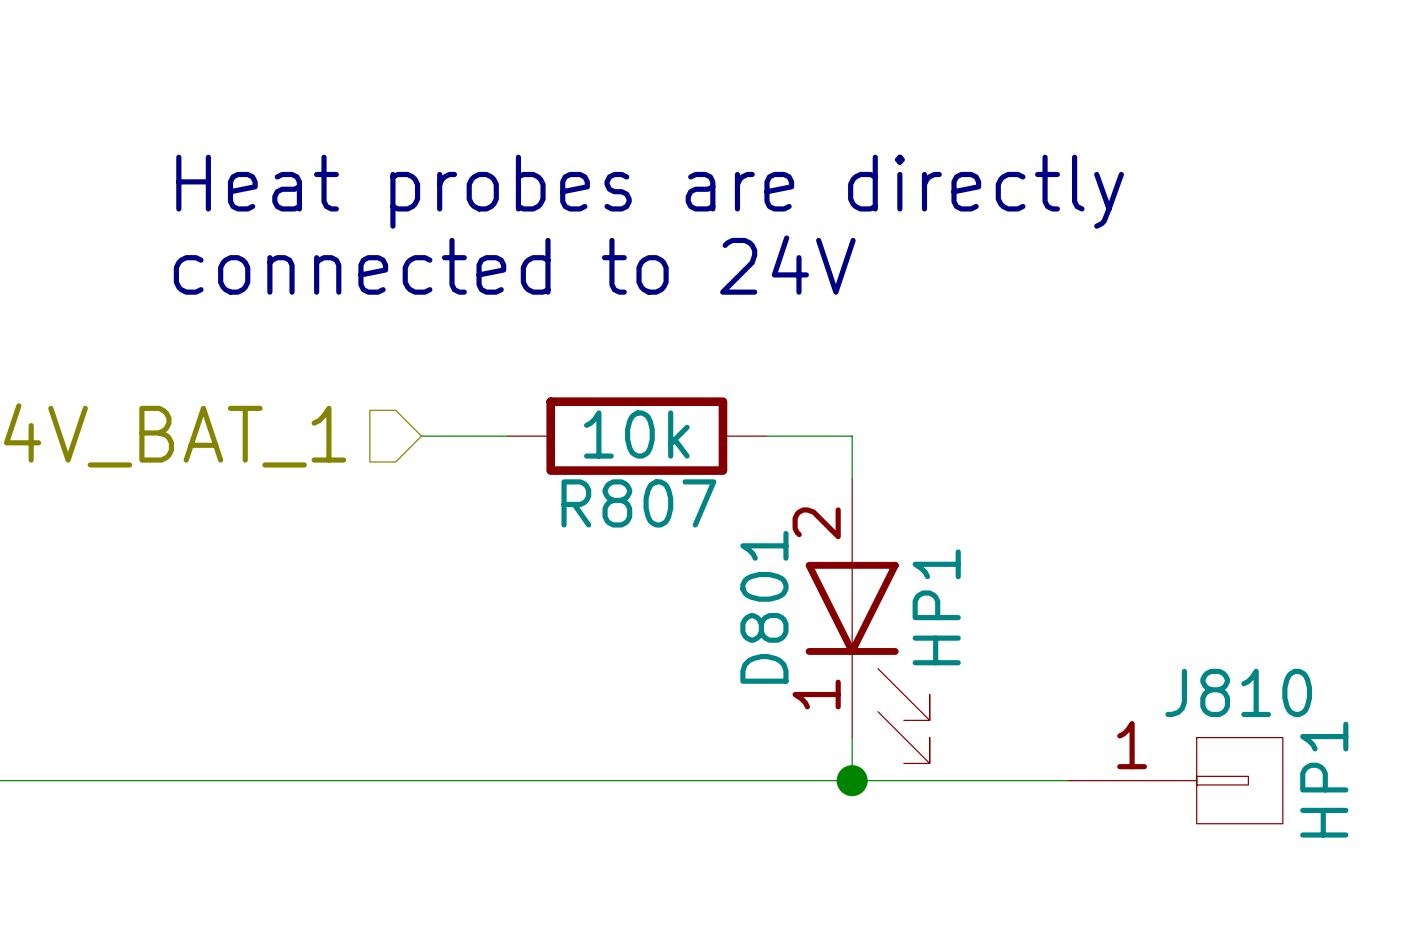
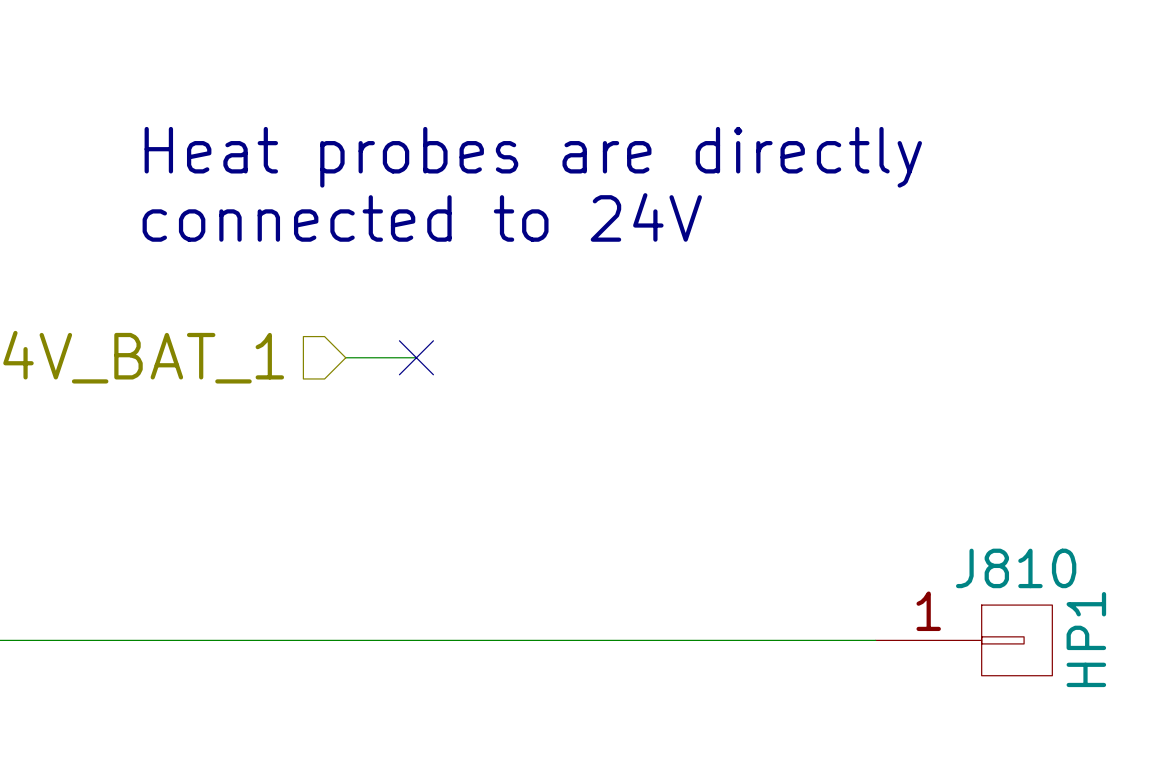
no-connect mark: none -> (416, 357)
R807: 10k (636, 436) -> none
wire: (766, 436) (852, 436) (852, 479) -> none
D801: HP1 (867, 621) -> none
wire: (852, 737) (852, 780) -> none
junction: (852, 780) -> none

